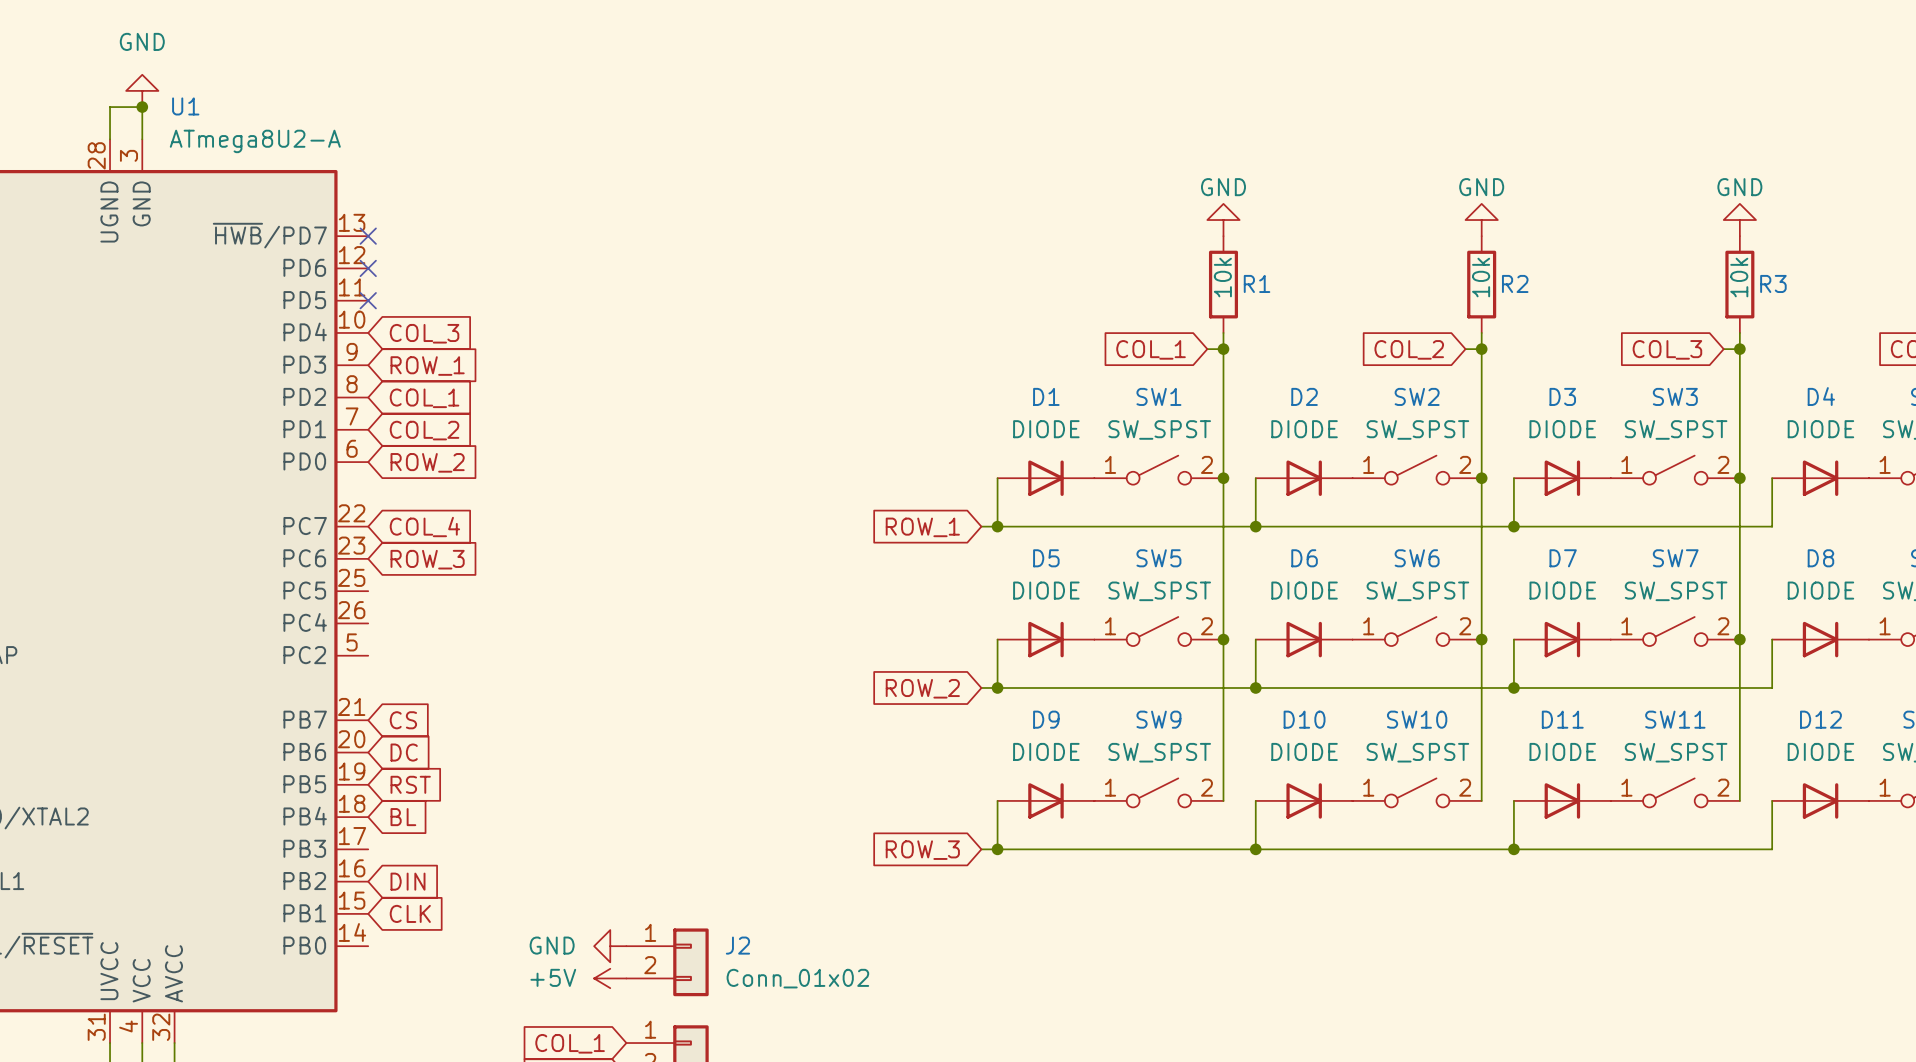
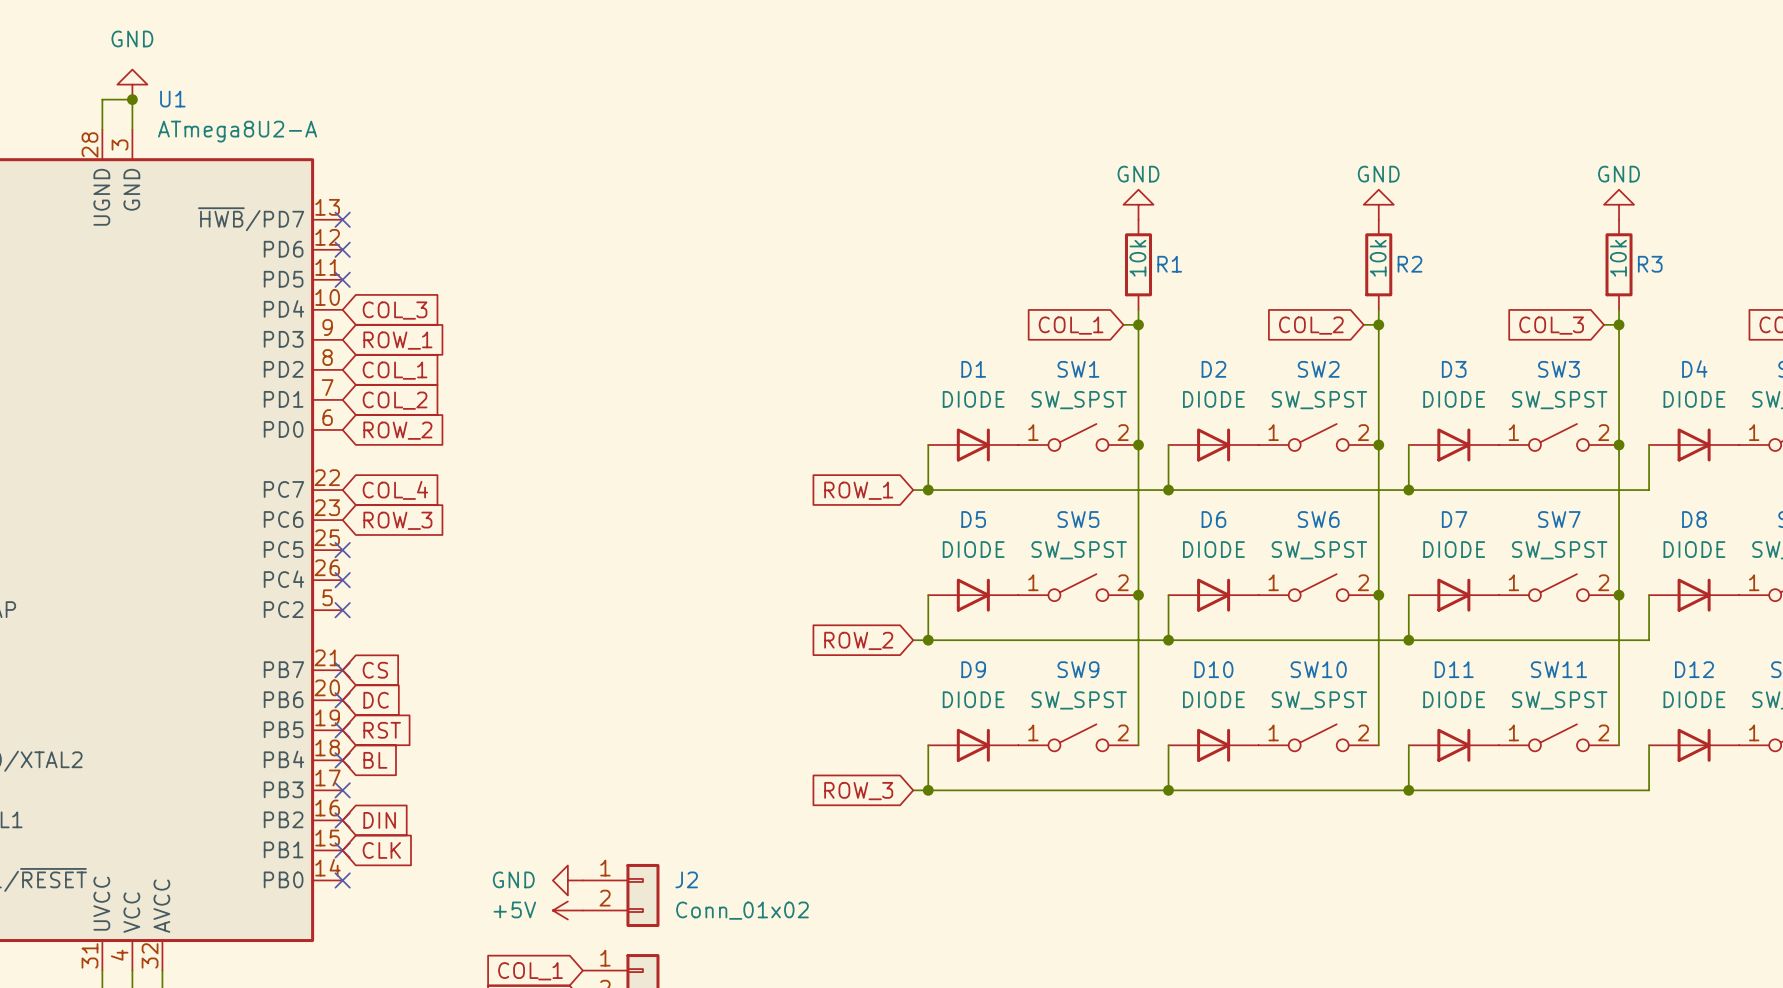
no-connect mark: none -> (342, 550)
no-connect mark: none -> (342, 580)
no-connect mark: none -> (342, 610)
no-connect mark: none -> (342, 670)
no-connect mark: none -> (342, 700)
no-connect mark: none -> (342, 730)
no-connect mark: none -> (342, 760)
no-connect mark: none -> (342, 790)
no-connect mark: none -> (342, 820)
no-connect mark: none -> (342, 850)
no-connect mark: none -> (342, 880)

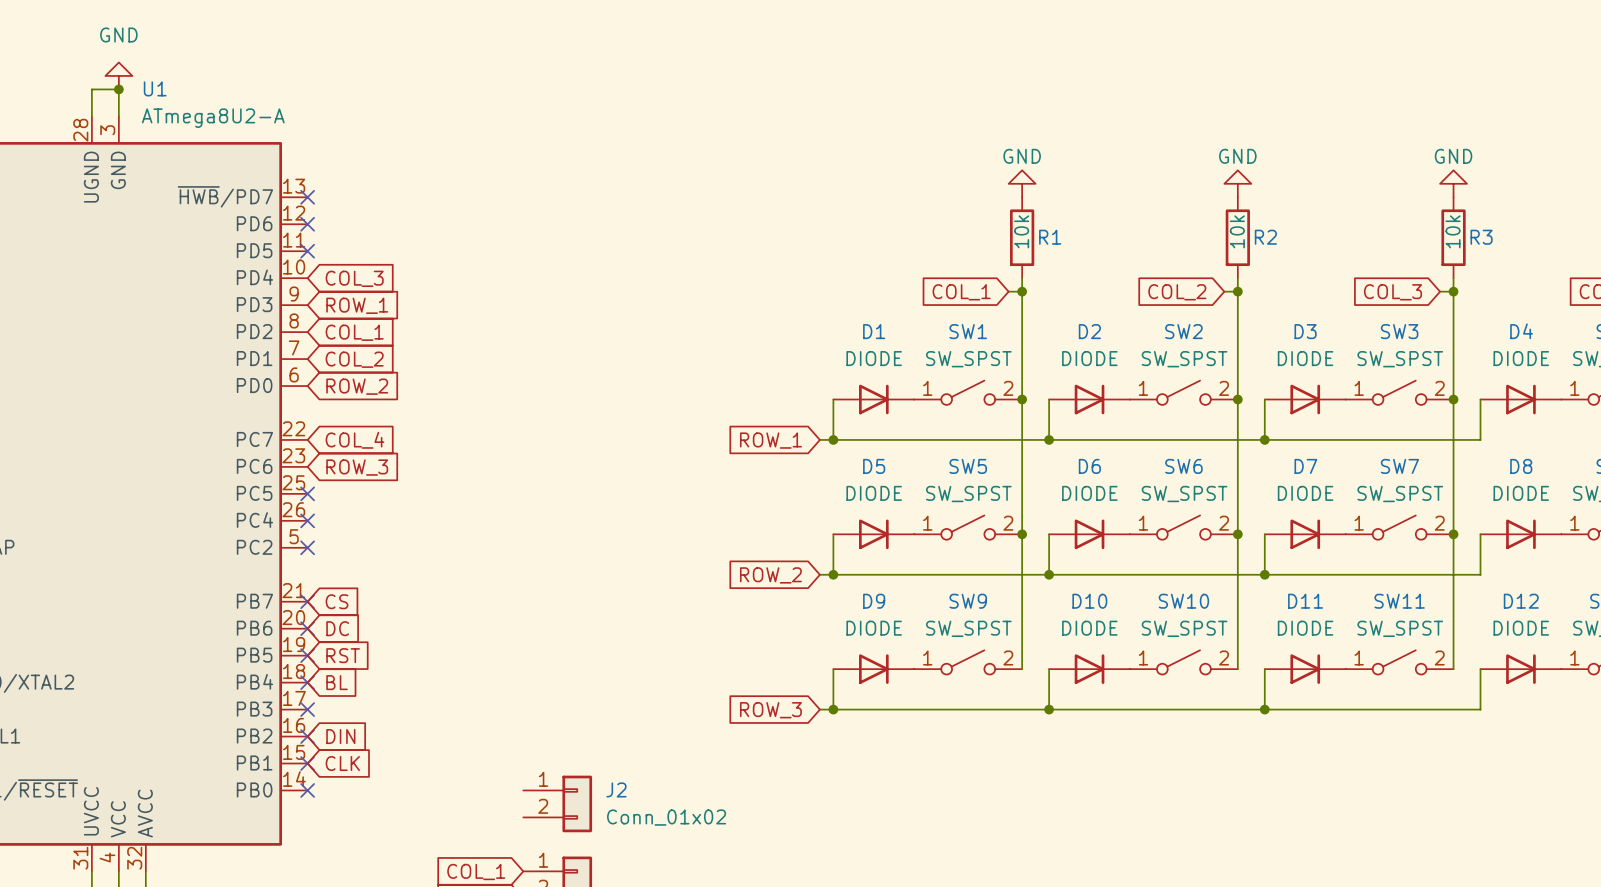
power symbol: GND (567, 880) -> none
power symbol: +5V (567, 910) -> none

